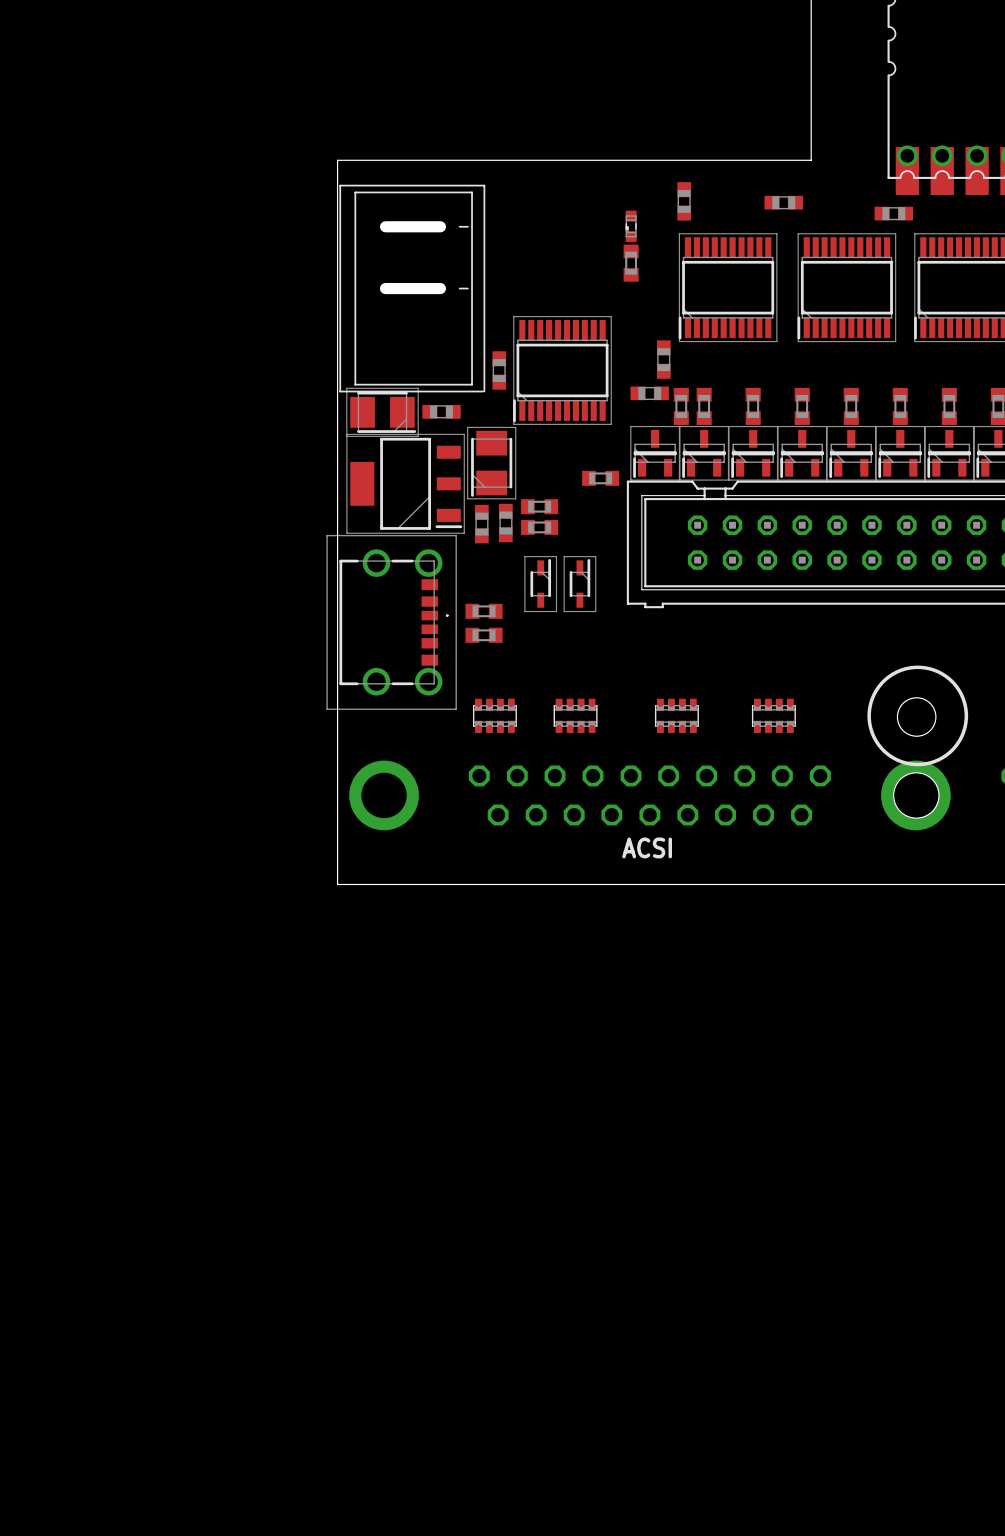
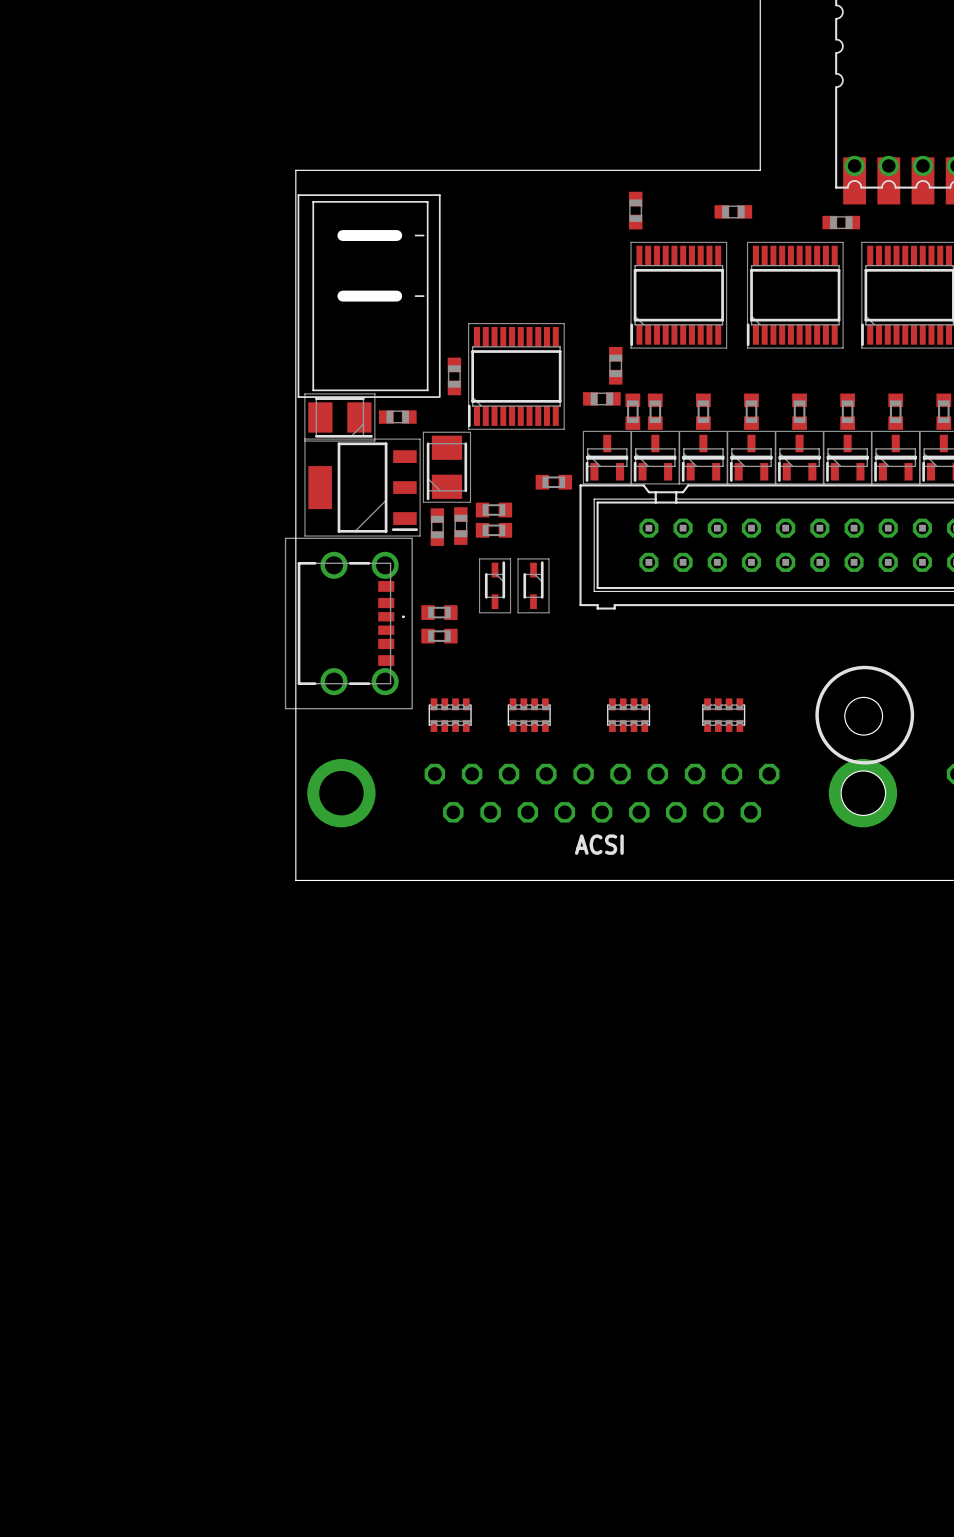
part: (631, 226) -> none
part: (631, 263) -> none

